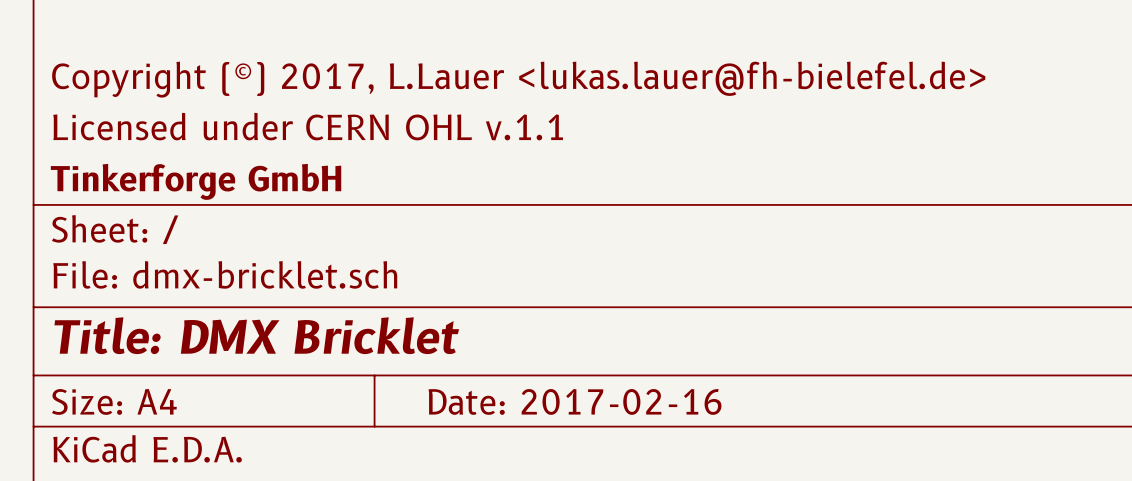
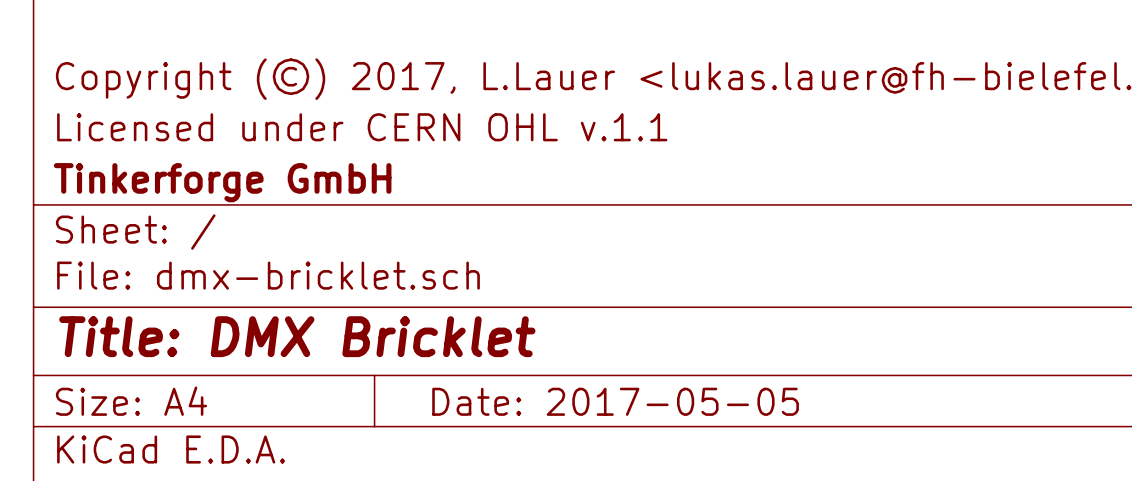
title block: Date: 2017-02-16 (575, 401) -> Date: 2017-05-05 (615, 401)

